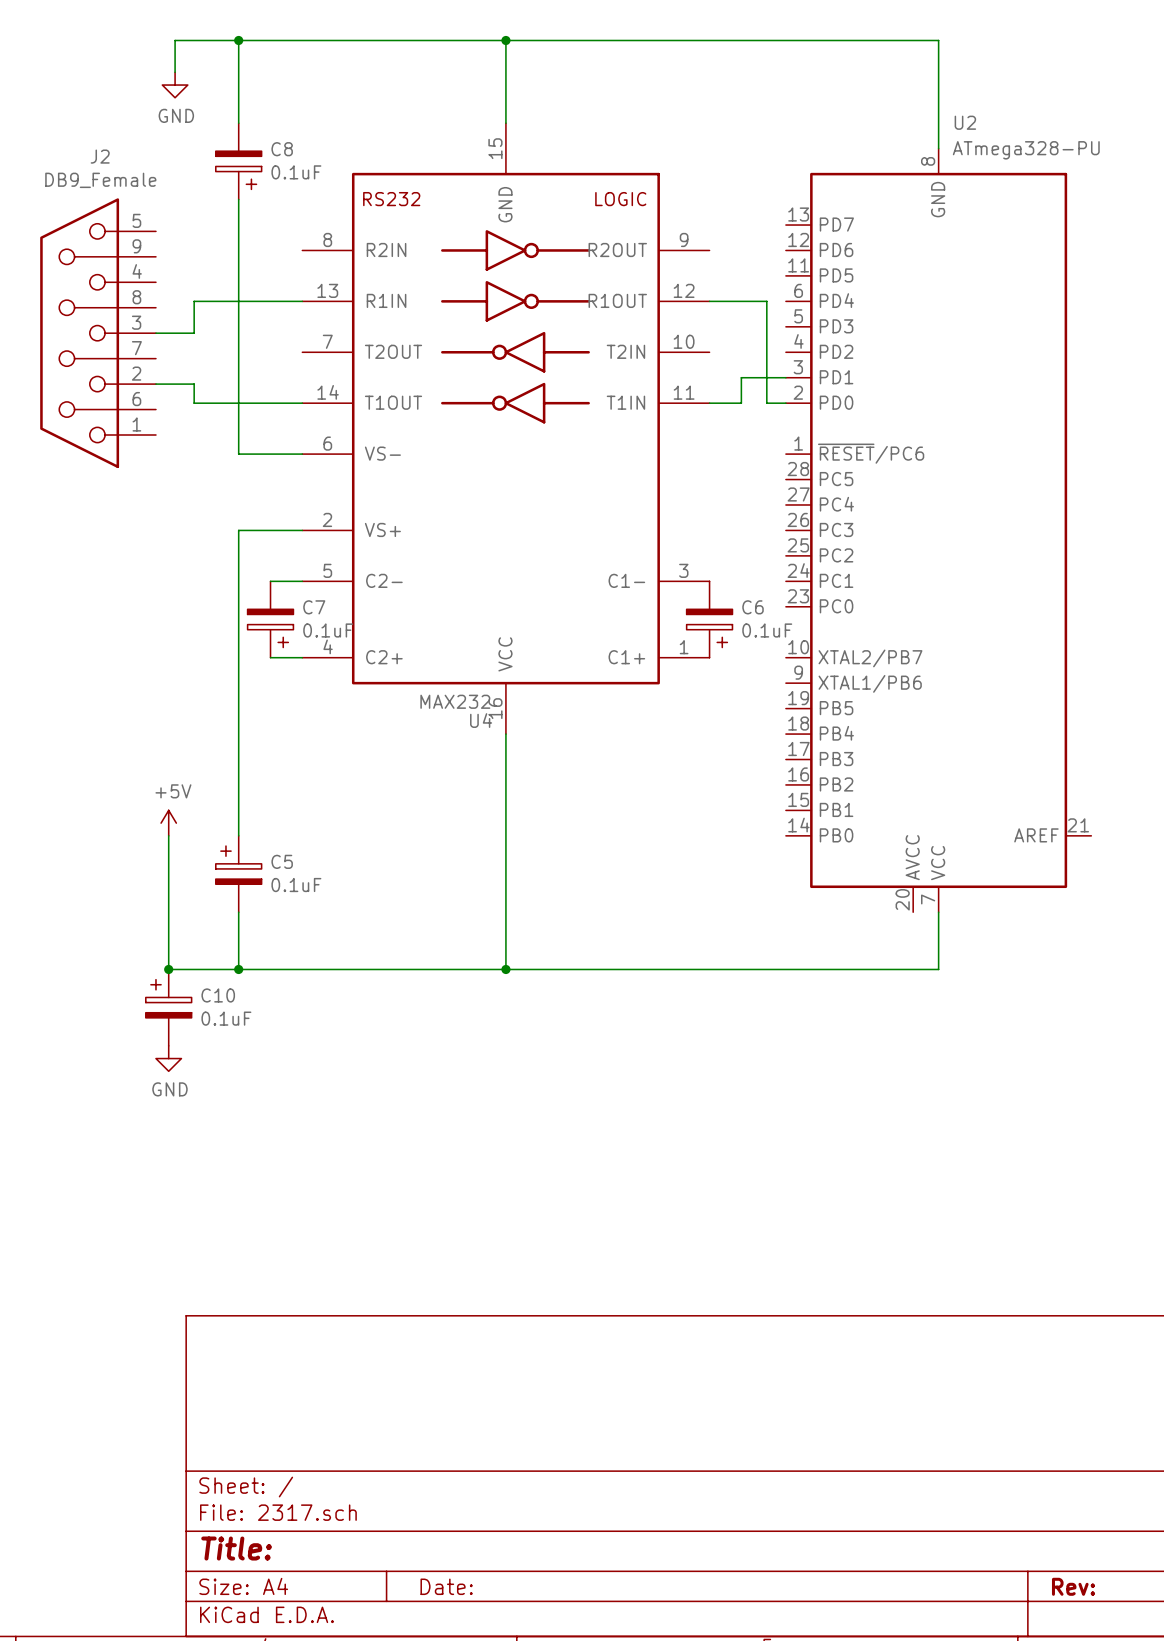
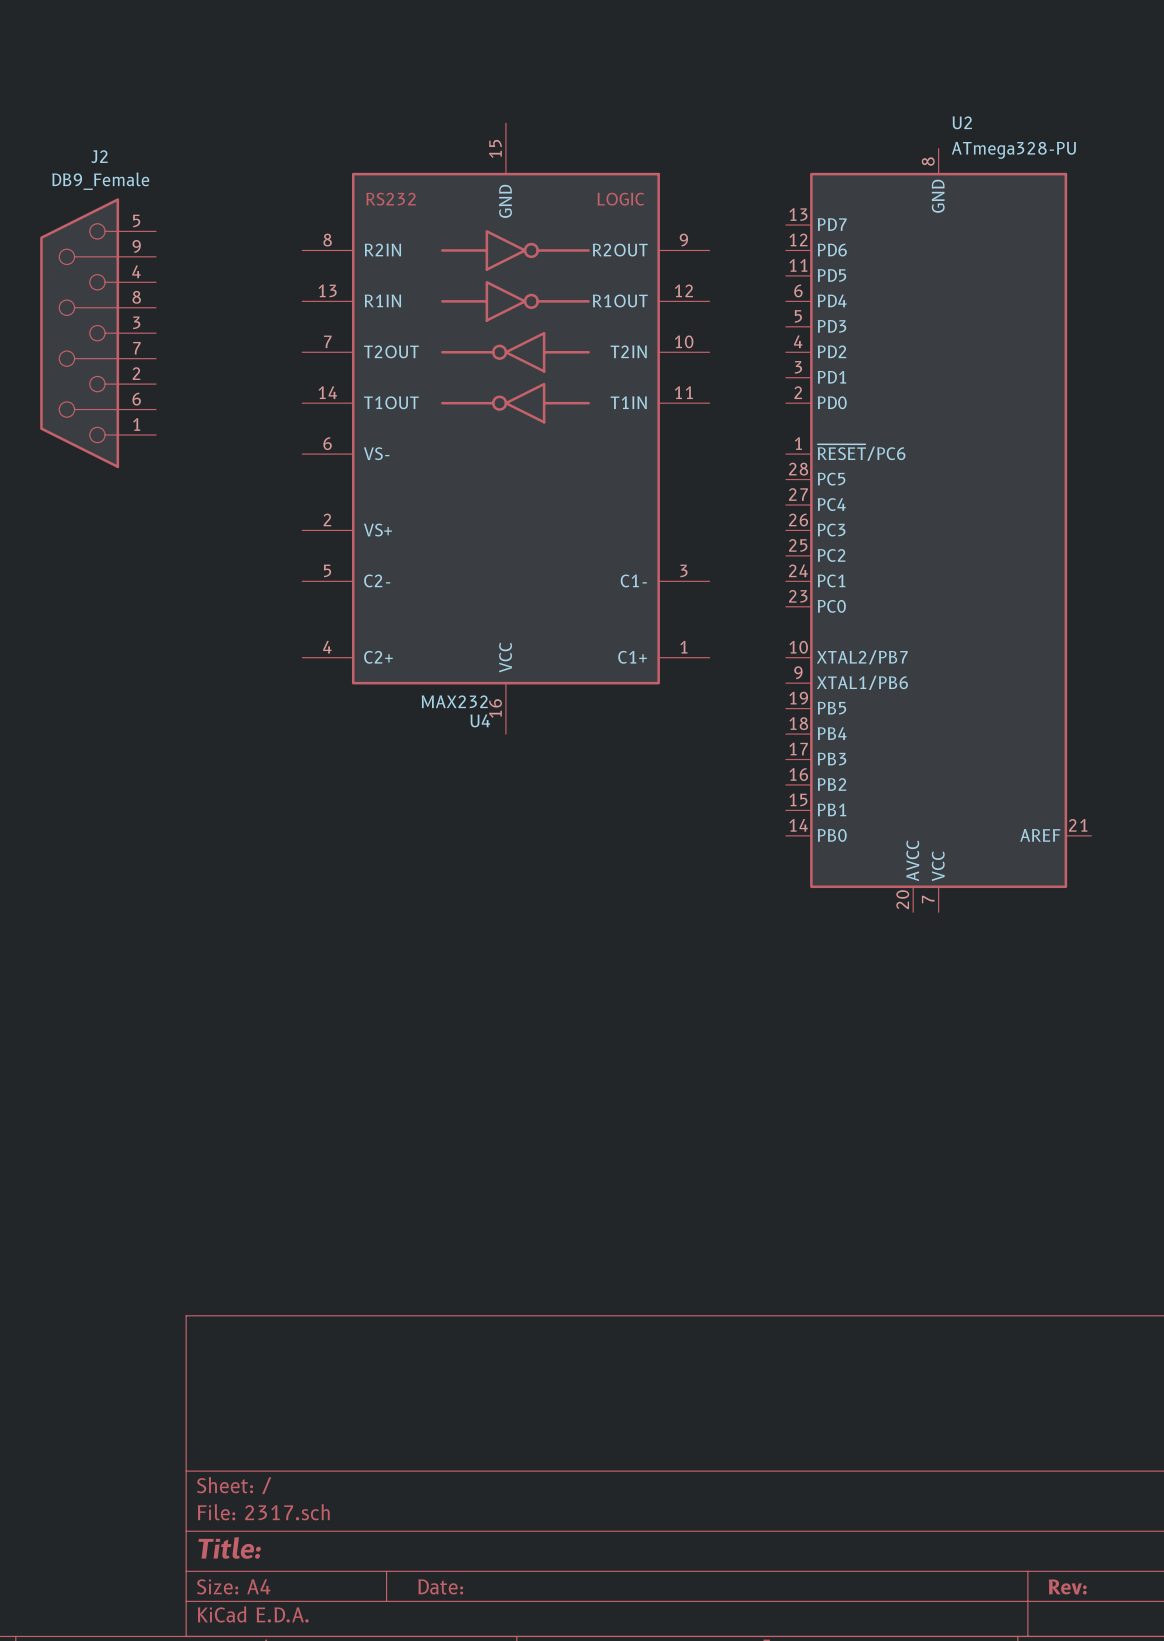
wire: (238, 40) (238, 123) -> none
junction: (238, 40) -> none
wire: (505, 40) (505, 123) -> none
junction: (505, 40) -> none
wire: (175, 72) (175, 40) (938, 40) (938, 148) -> none
power symbol: GND (175, 85) -> none
C8: 0.1uF (238, 161) -> none
wire: (238, 199) (238, 454) (302, 454) -> none
wire: (302, 301) (194, 301) (194, 333) (155, 333) -> none
wire: (709, 301) (766, 301) (766, 403) (785, 403) -> none
wire: (785, 377) (741, 377) (741, 403) (709, 403) -> none
wire: (155, 384) (194, 384) (194, 403) (302, 403) -> none
wire: (302, 530) (238, 530) (238, 835) -> none
wire: (270, 581) (302, 581) -> none
C7: 0.1uF (270, 619) -> none
C6: 0.1uF (709, 619) -> none
wire: (270, 657) (302, 657) -> none
wire: (505, 734) (505, 969) -> none
power symbol: +5V (168, 823) -> none
wire: (168, 835) (168, 969) (938, 969) (938, 912) -> none
C5: 0.1uF (238, 874) -> none
wire: (238, 912) (238, 969) -> none
junction: (168, 969) -> none
junction: (238, 969) -> none
junction: (505, 969) -> none
C10: 0.1uF (168, 1007) -> none
power symbol: GND (168, 1058) -> none

